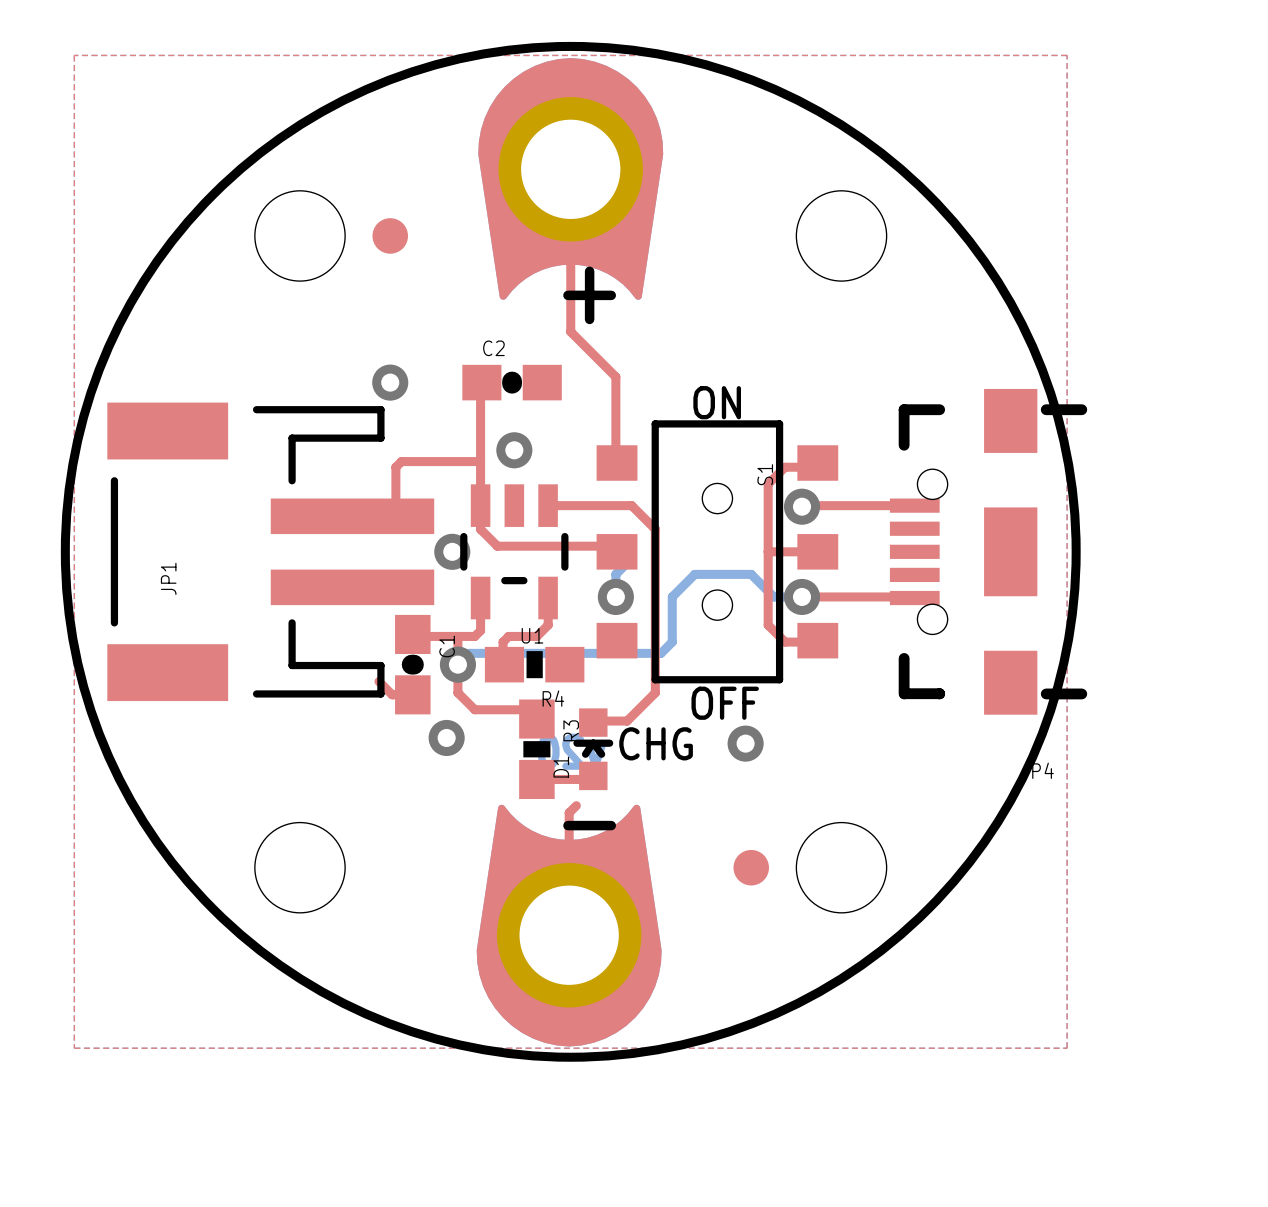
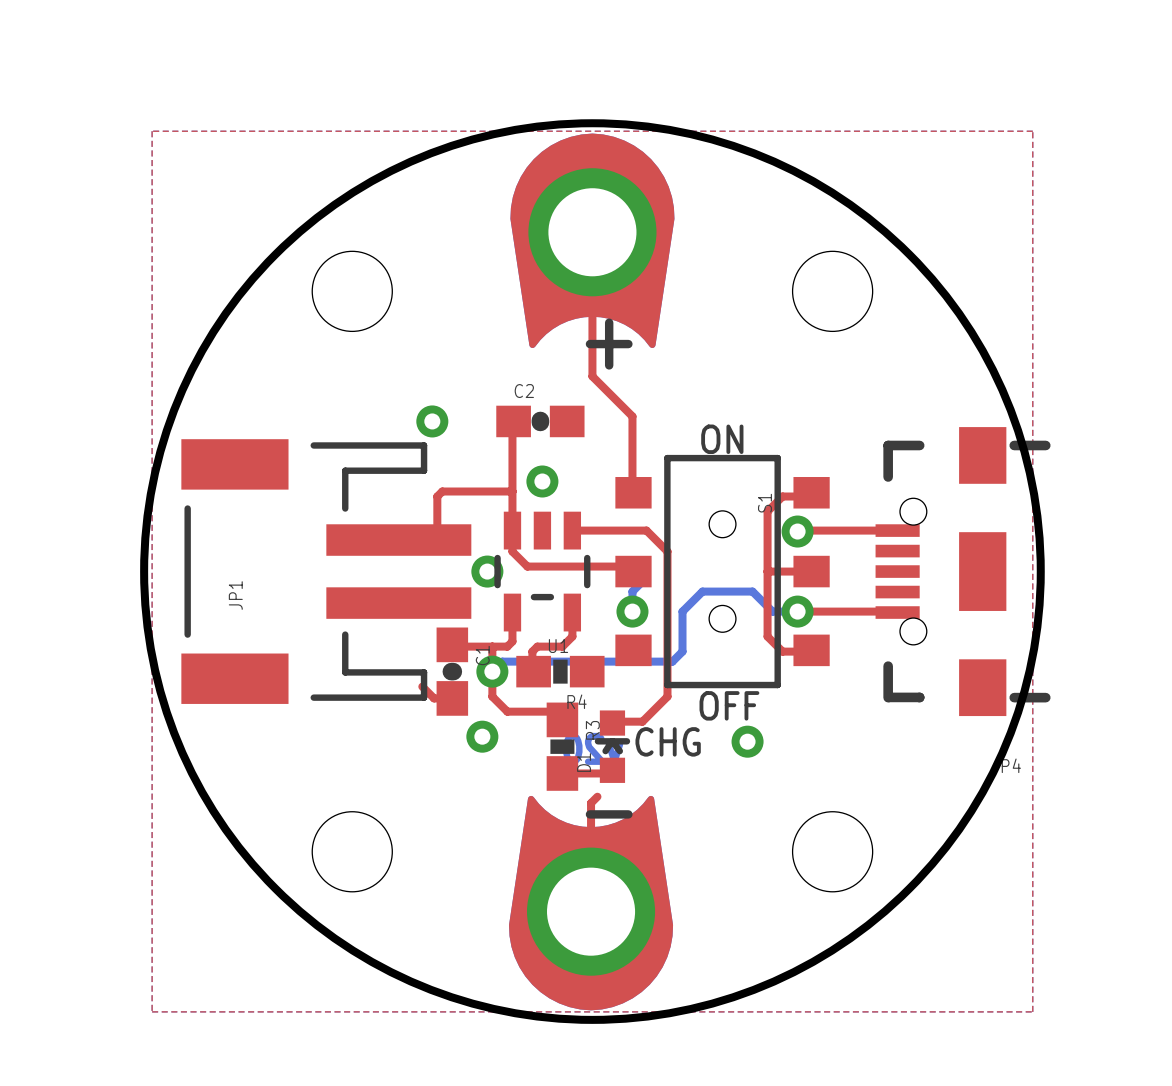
part: (390, 235) -> none
part: (751, 867) -> none

